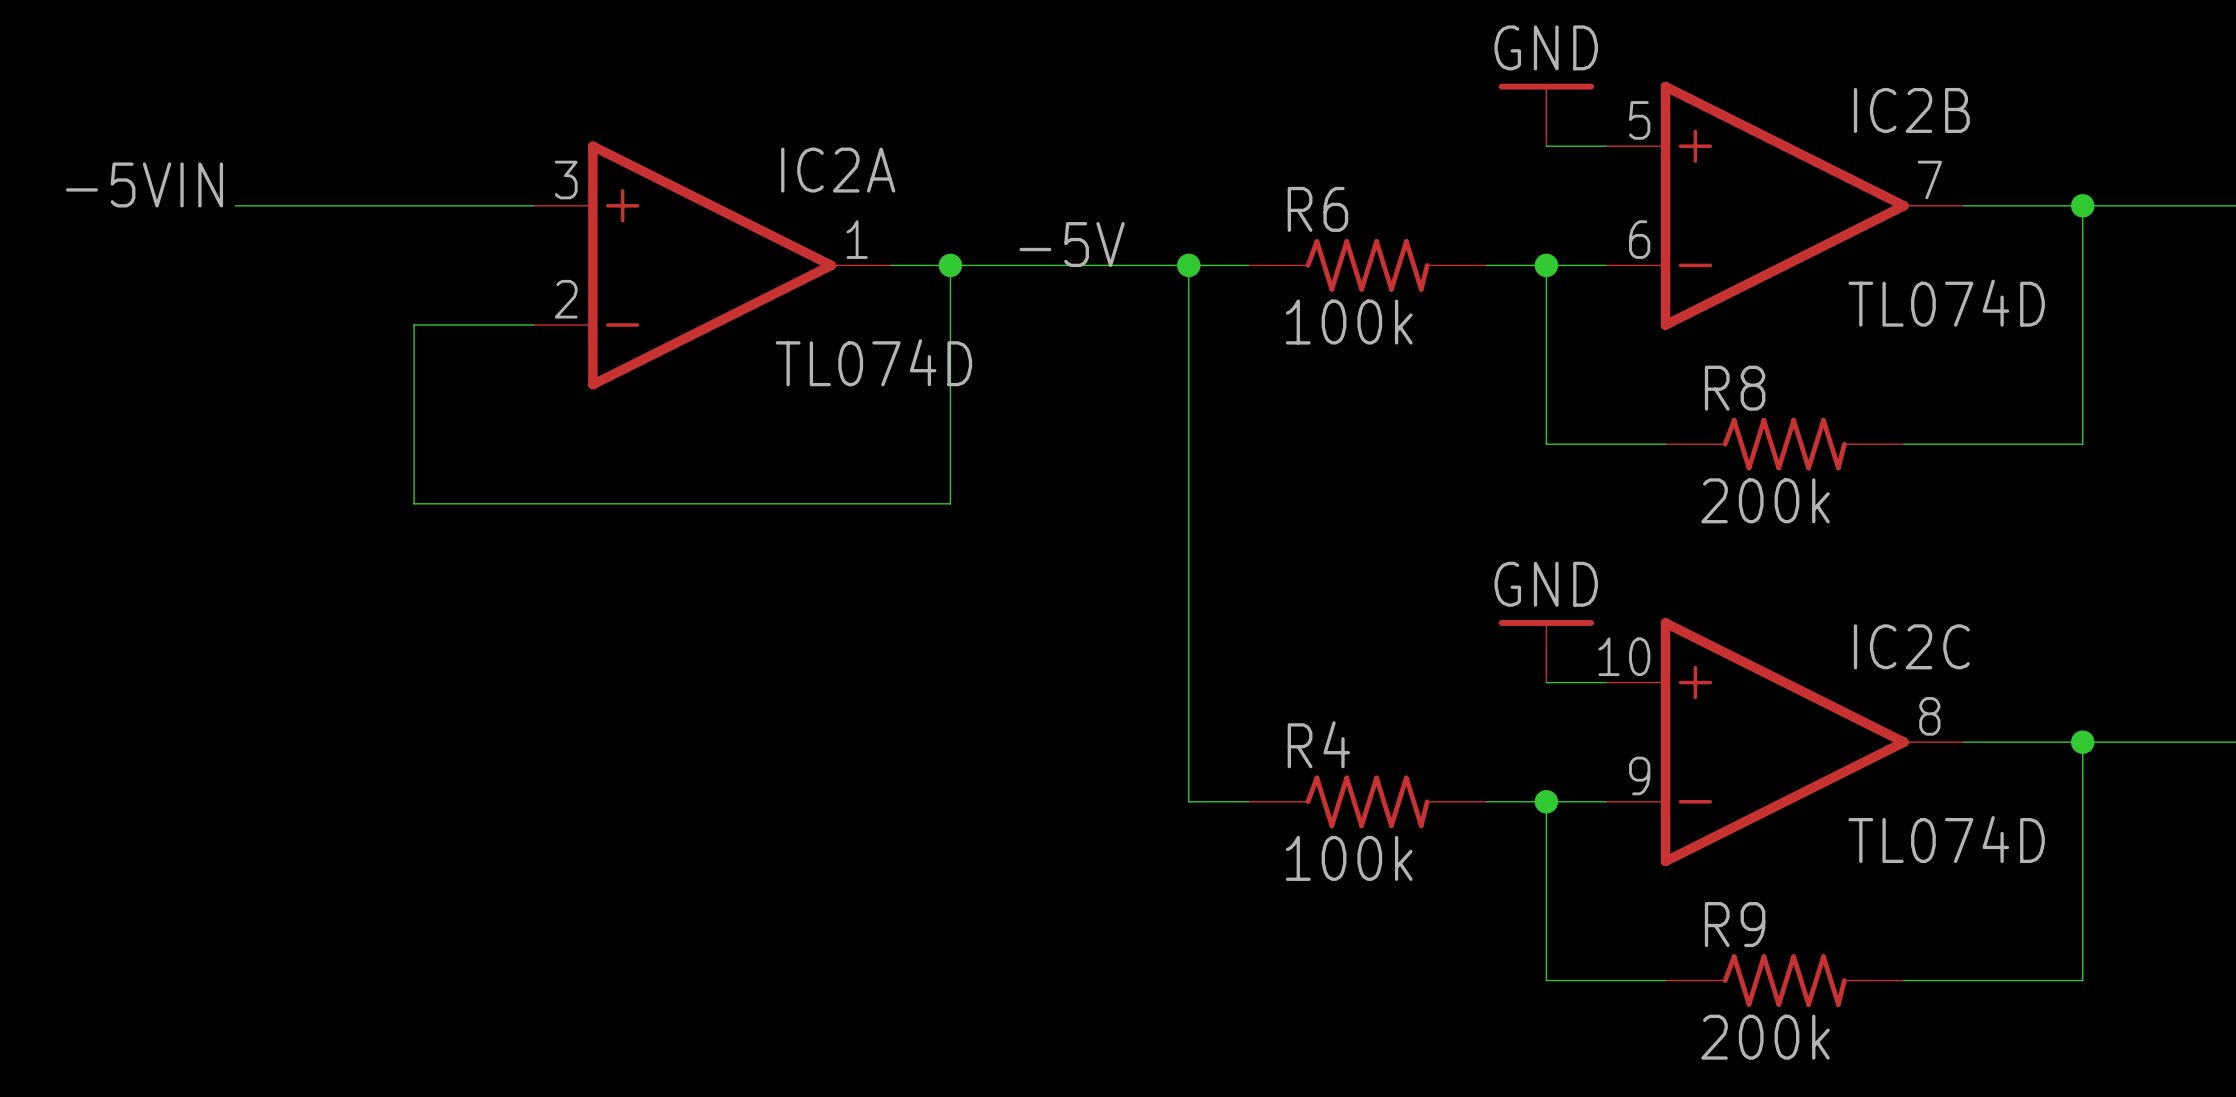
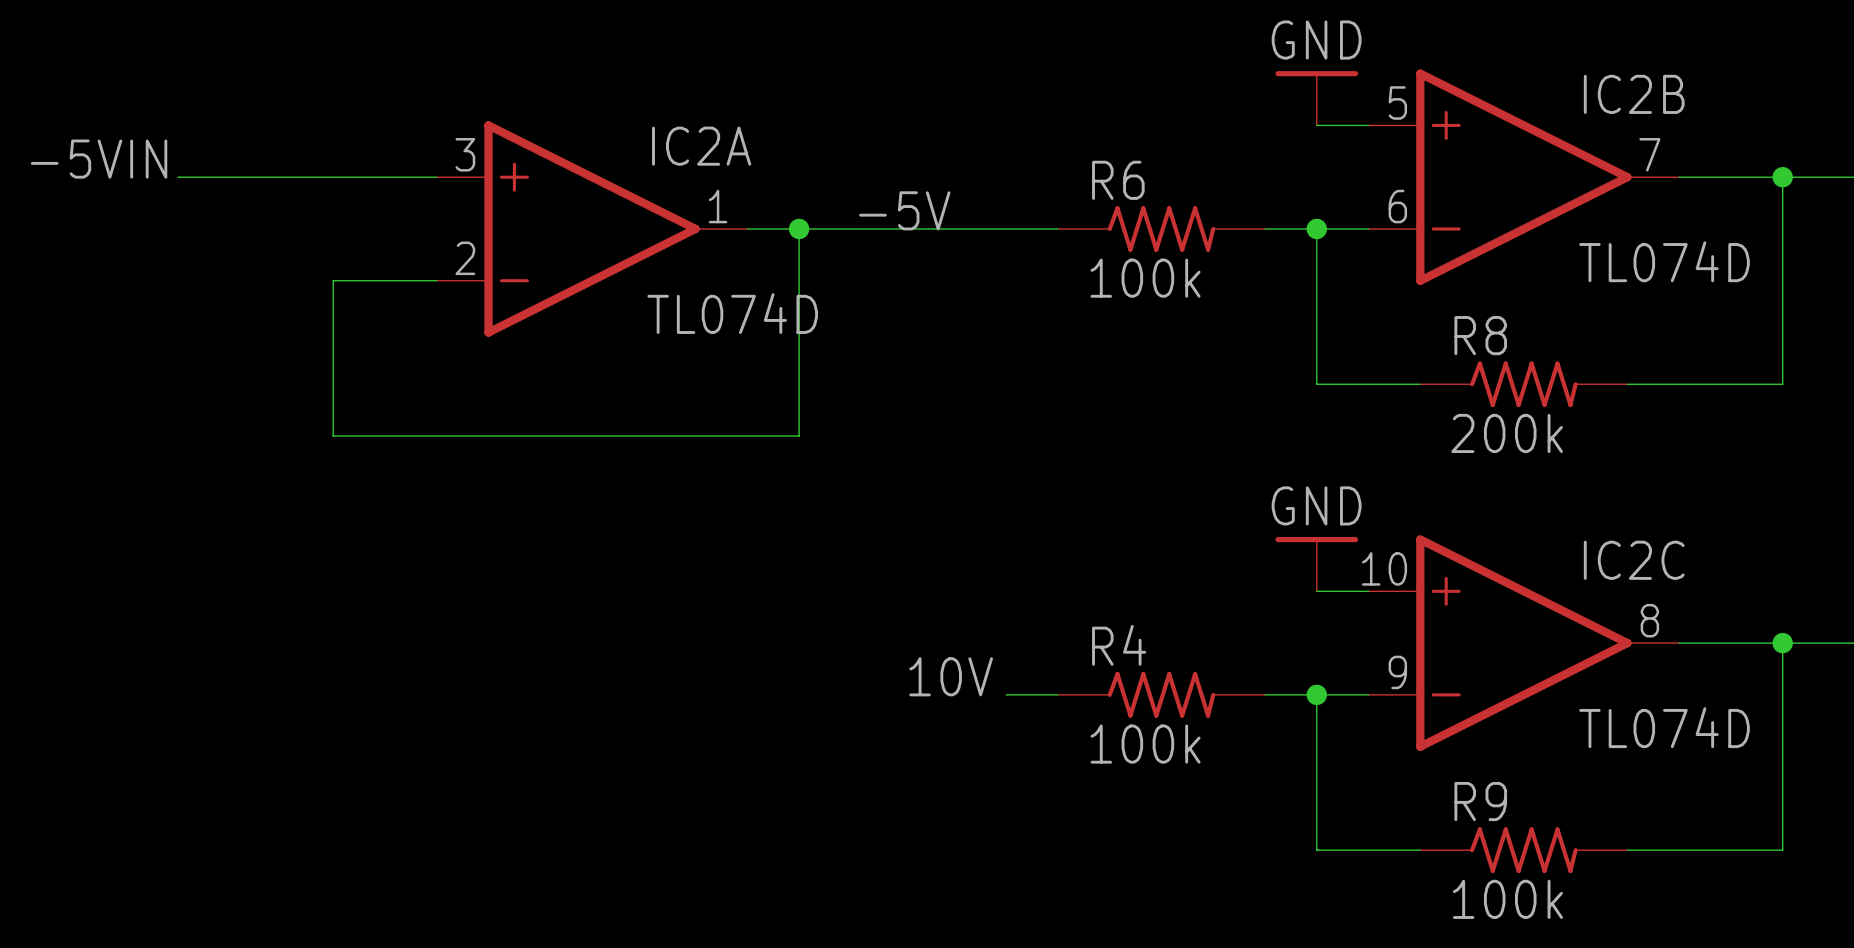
wire: (1188, 265) (1188, 801) -> none
junction: (1188, 265) -> none
label: none -> 10V (951, 676)
R9 value: 200k (1765, 1037) -> 100k (1507, 899)

